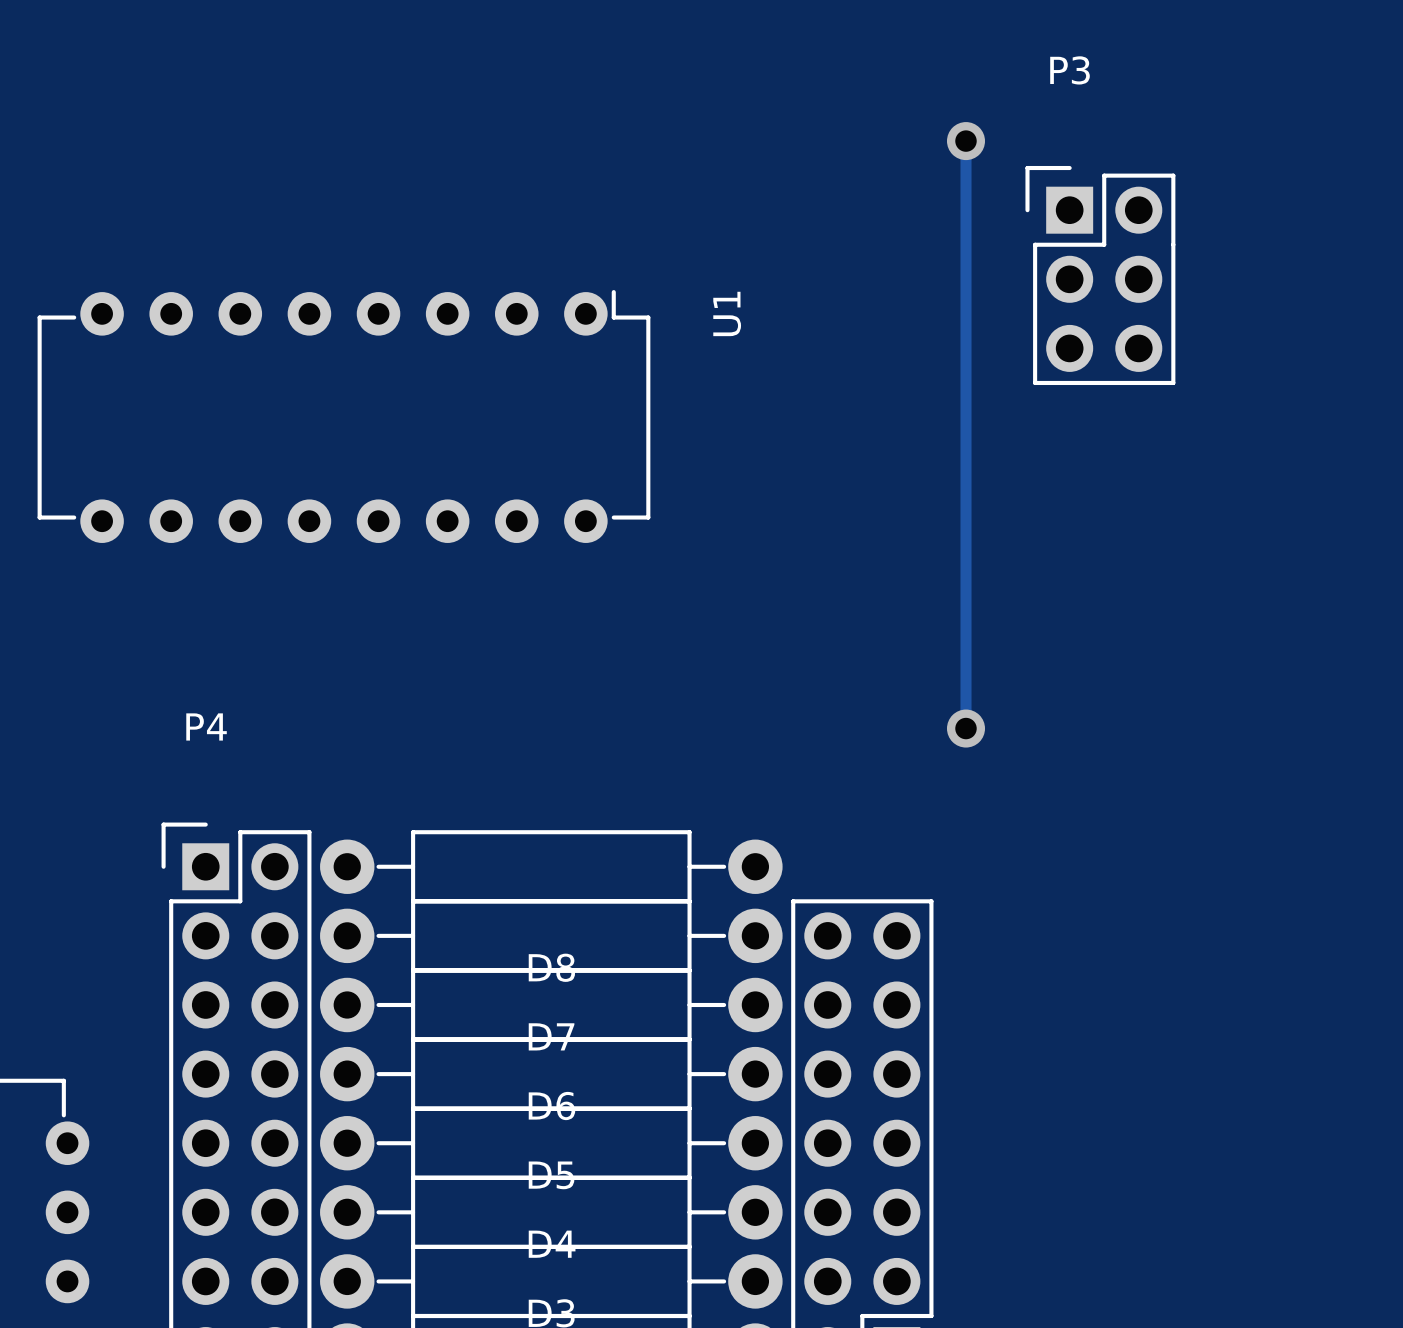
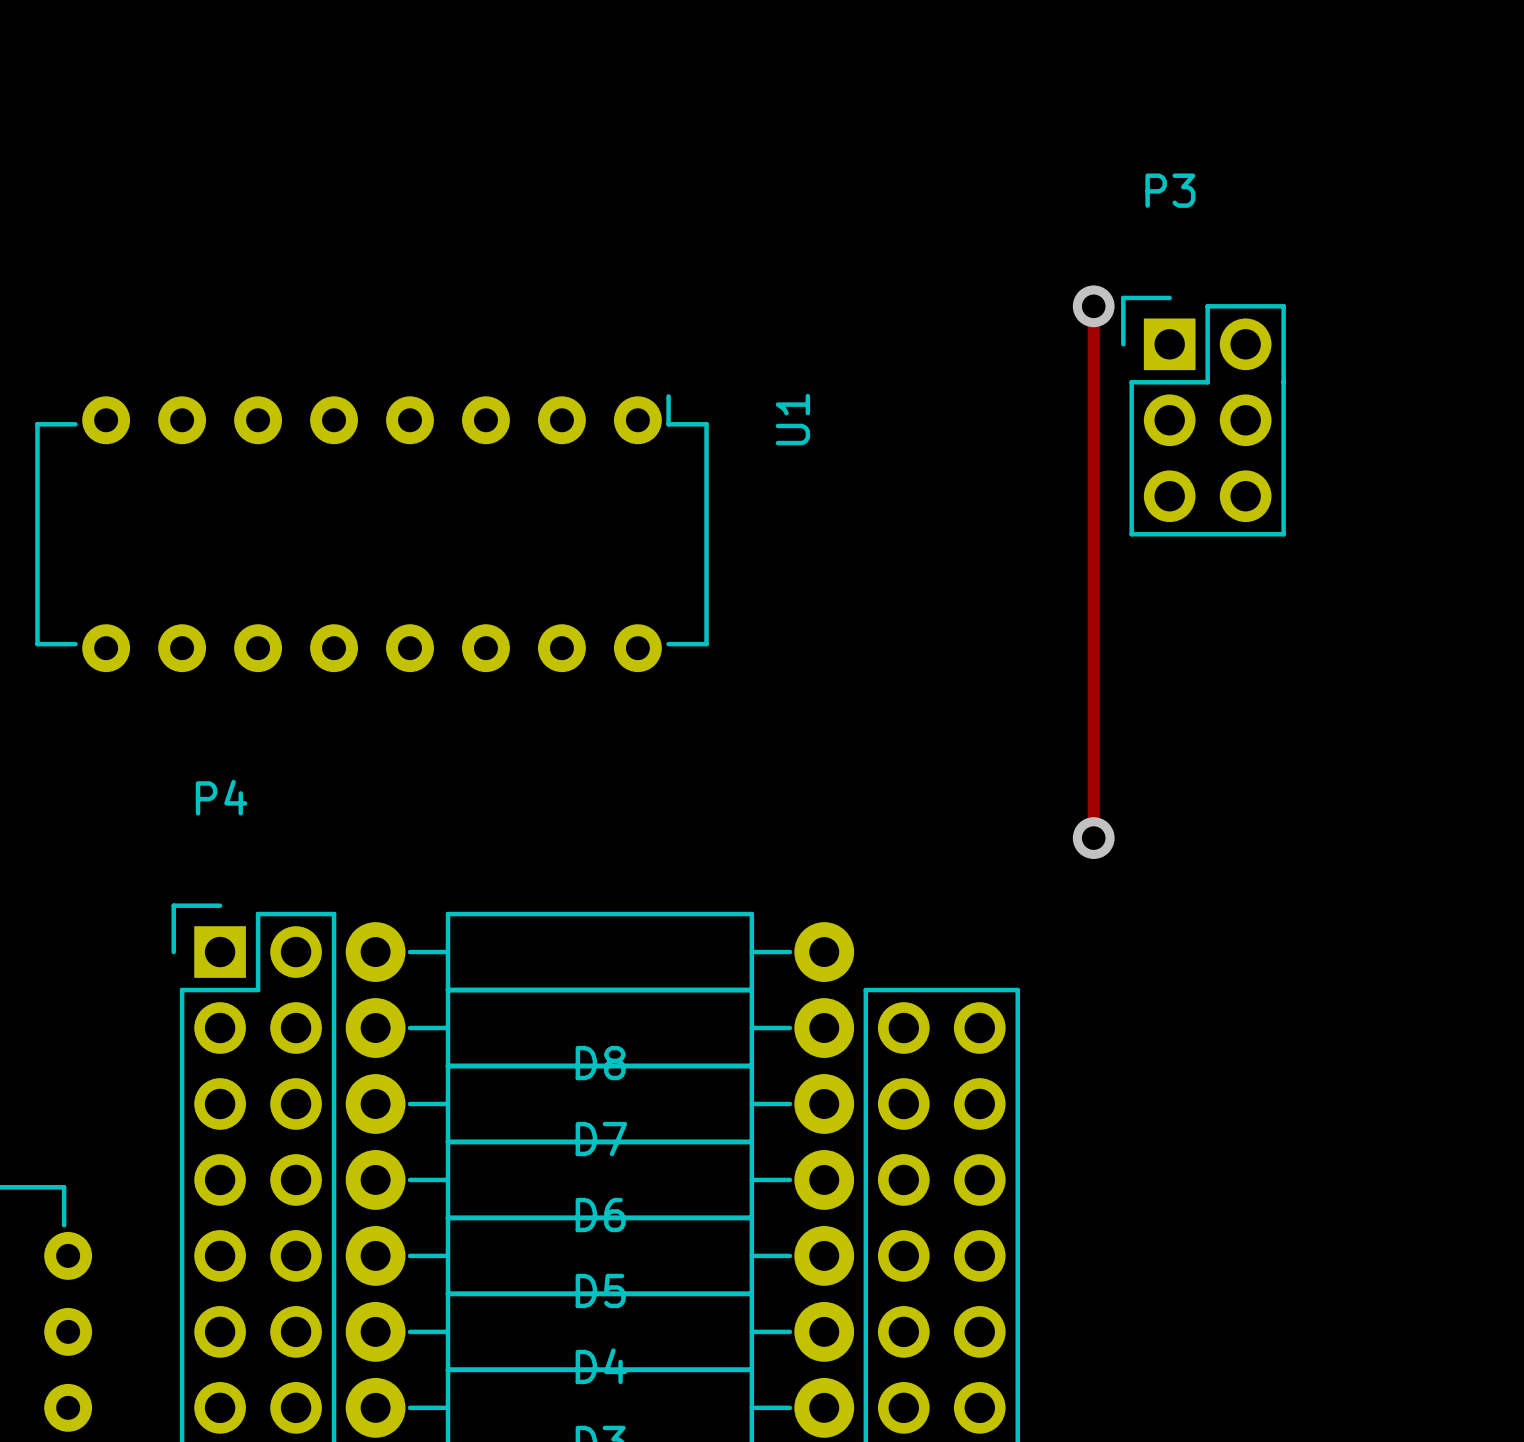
track: (966, 141) (966, 728) -> none
via position: (966, 141) -> (1093, 306)
P3 position: (1100, 275) -> (1203, 416)
track: none -> (1093, 306) (1093, 838)
U1 position: (343, 416) -> (372, 533)
via position: (966, 728) -> (1093, 838)

